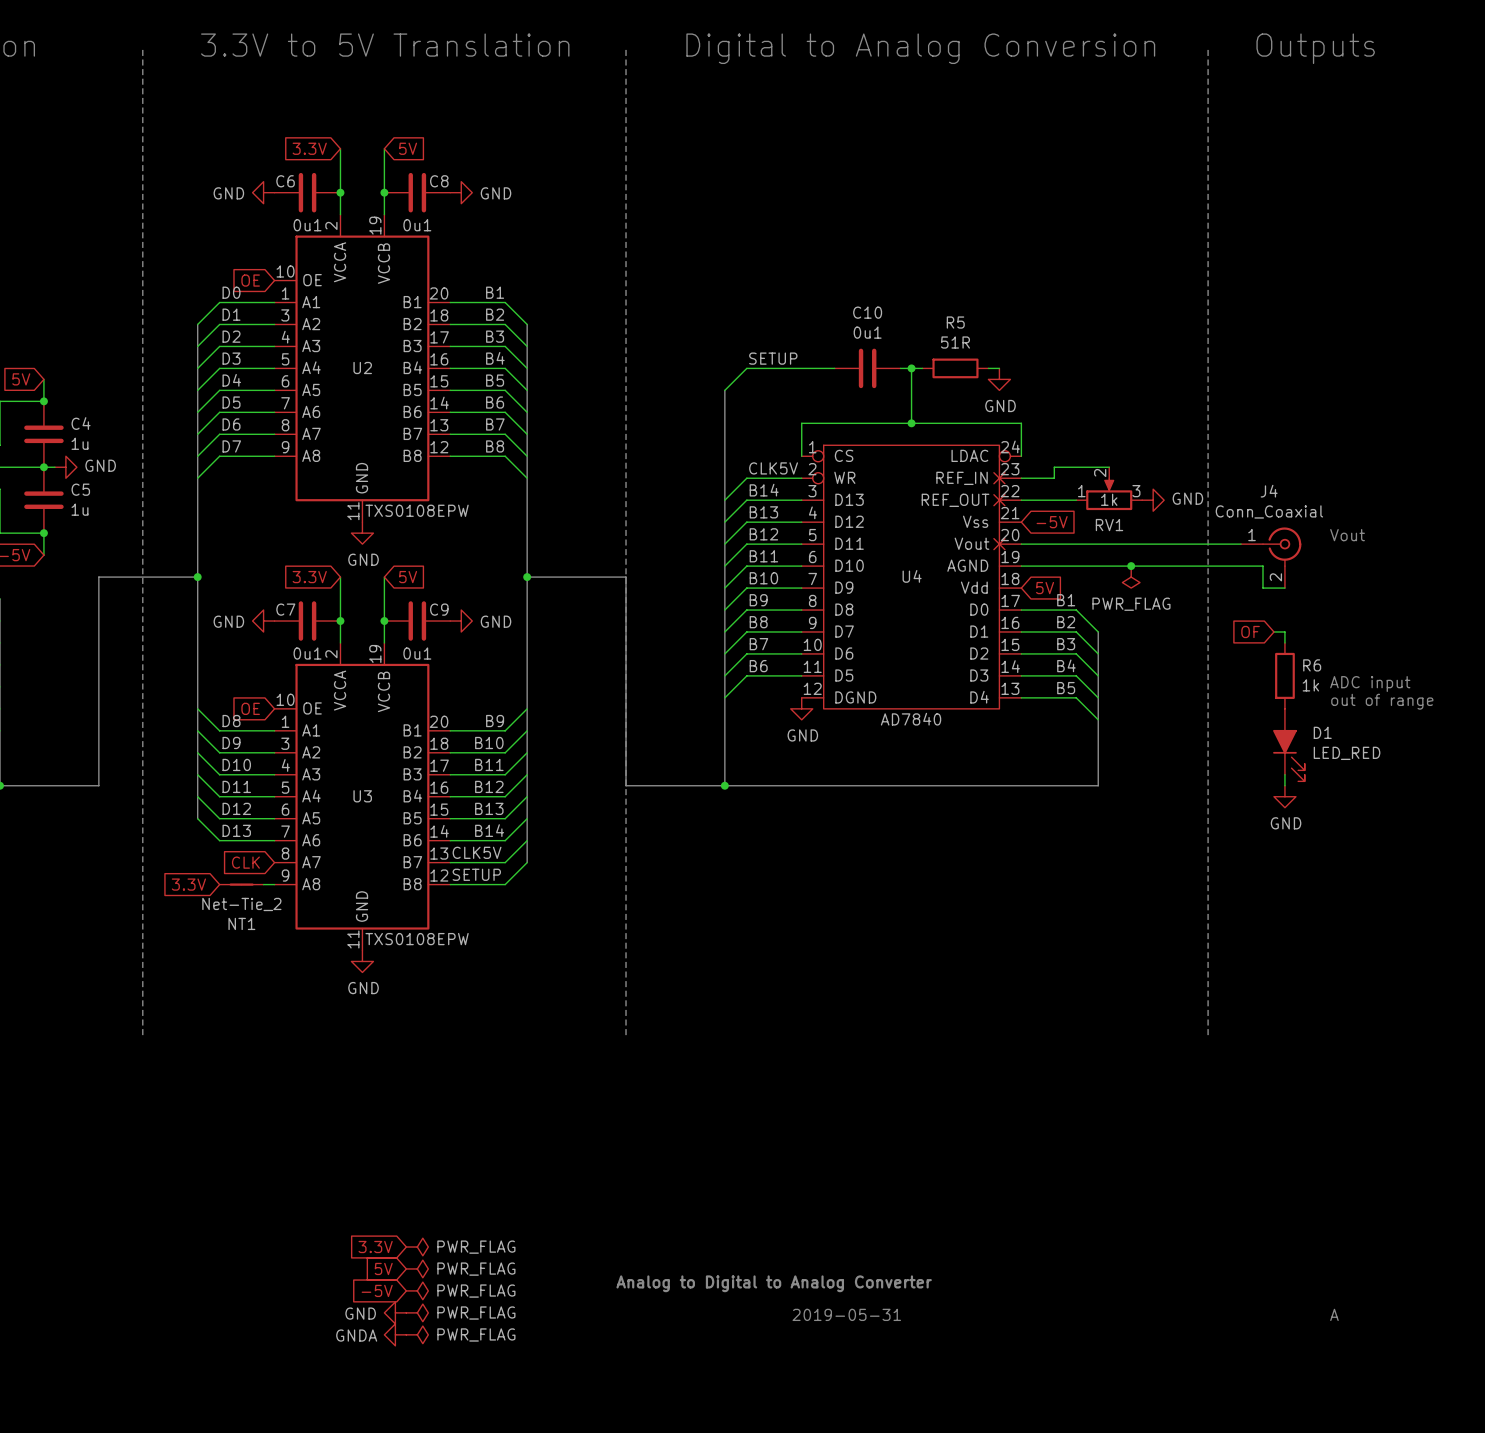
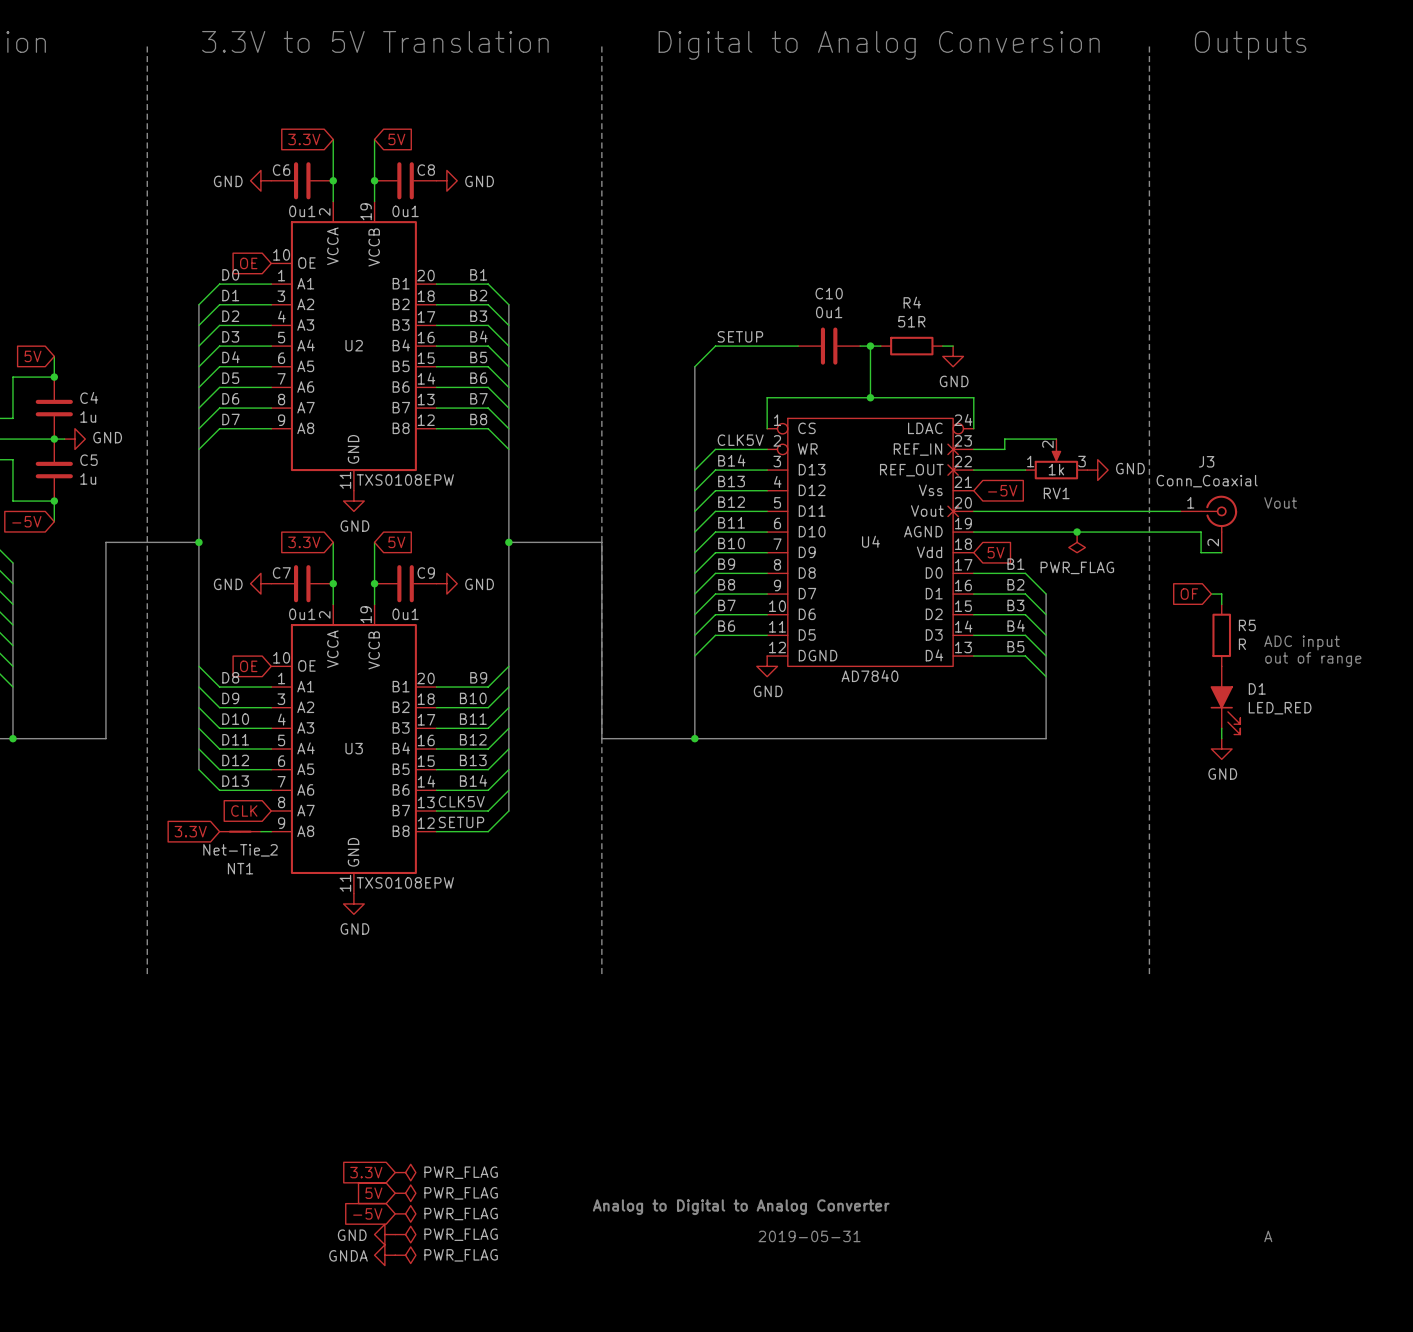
R5 name: R5 (955, 322) -> R4 (912, 302)
J4 name: J4 (1269, 491) -> J3 (1206, 461)
R6 name: R6 (1312, 665) -> R5 (1247, 625)
R6 value: 1k (1310, 685) -> R (1242, 644)

